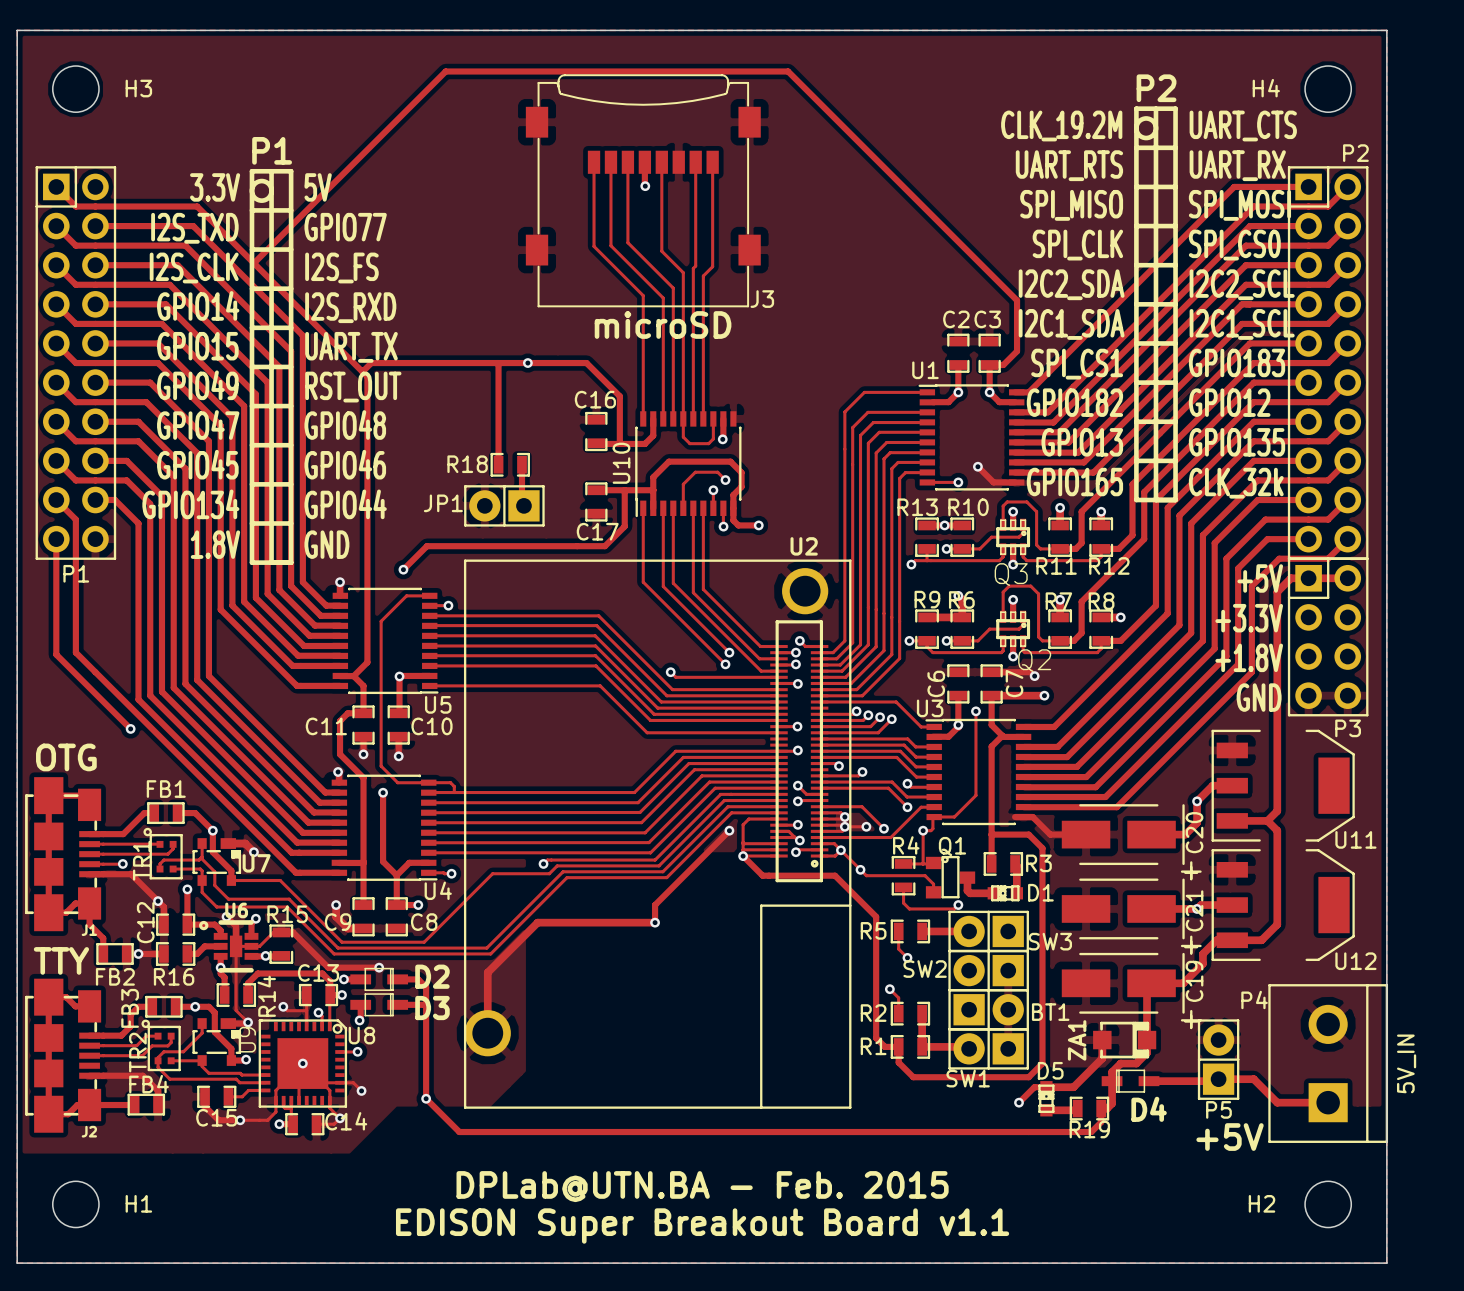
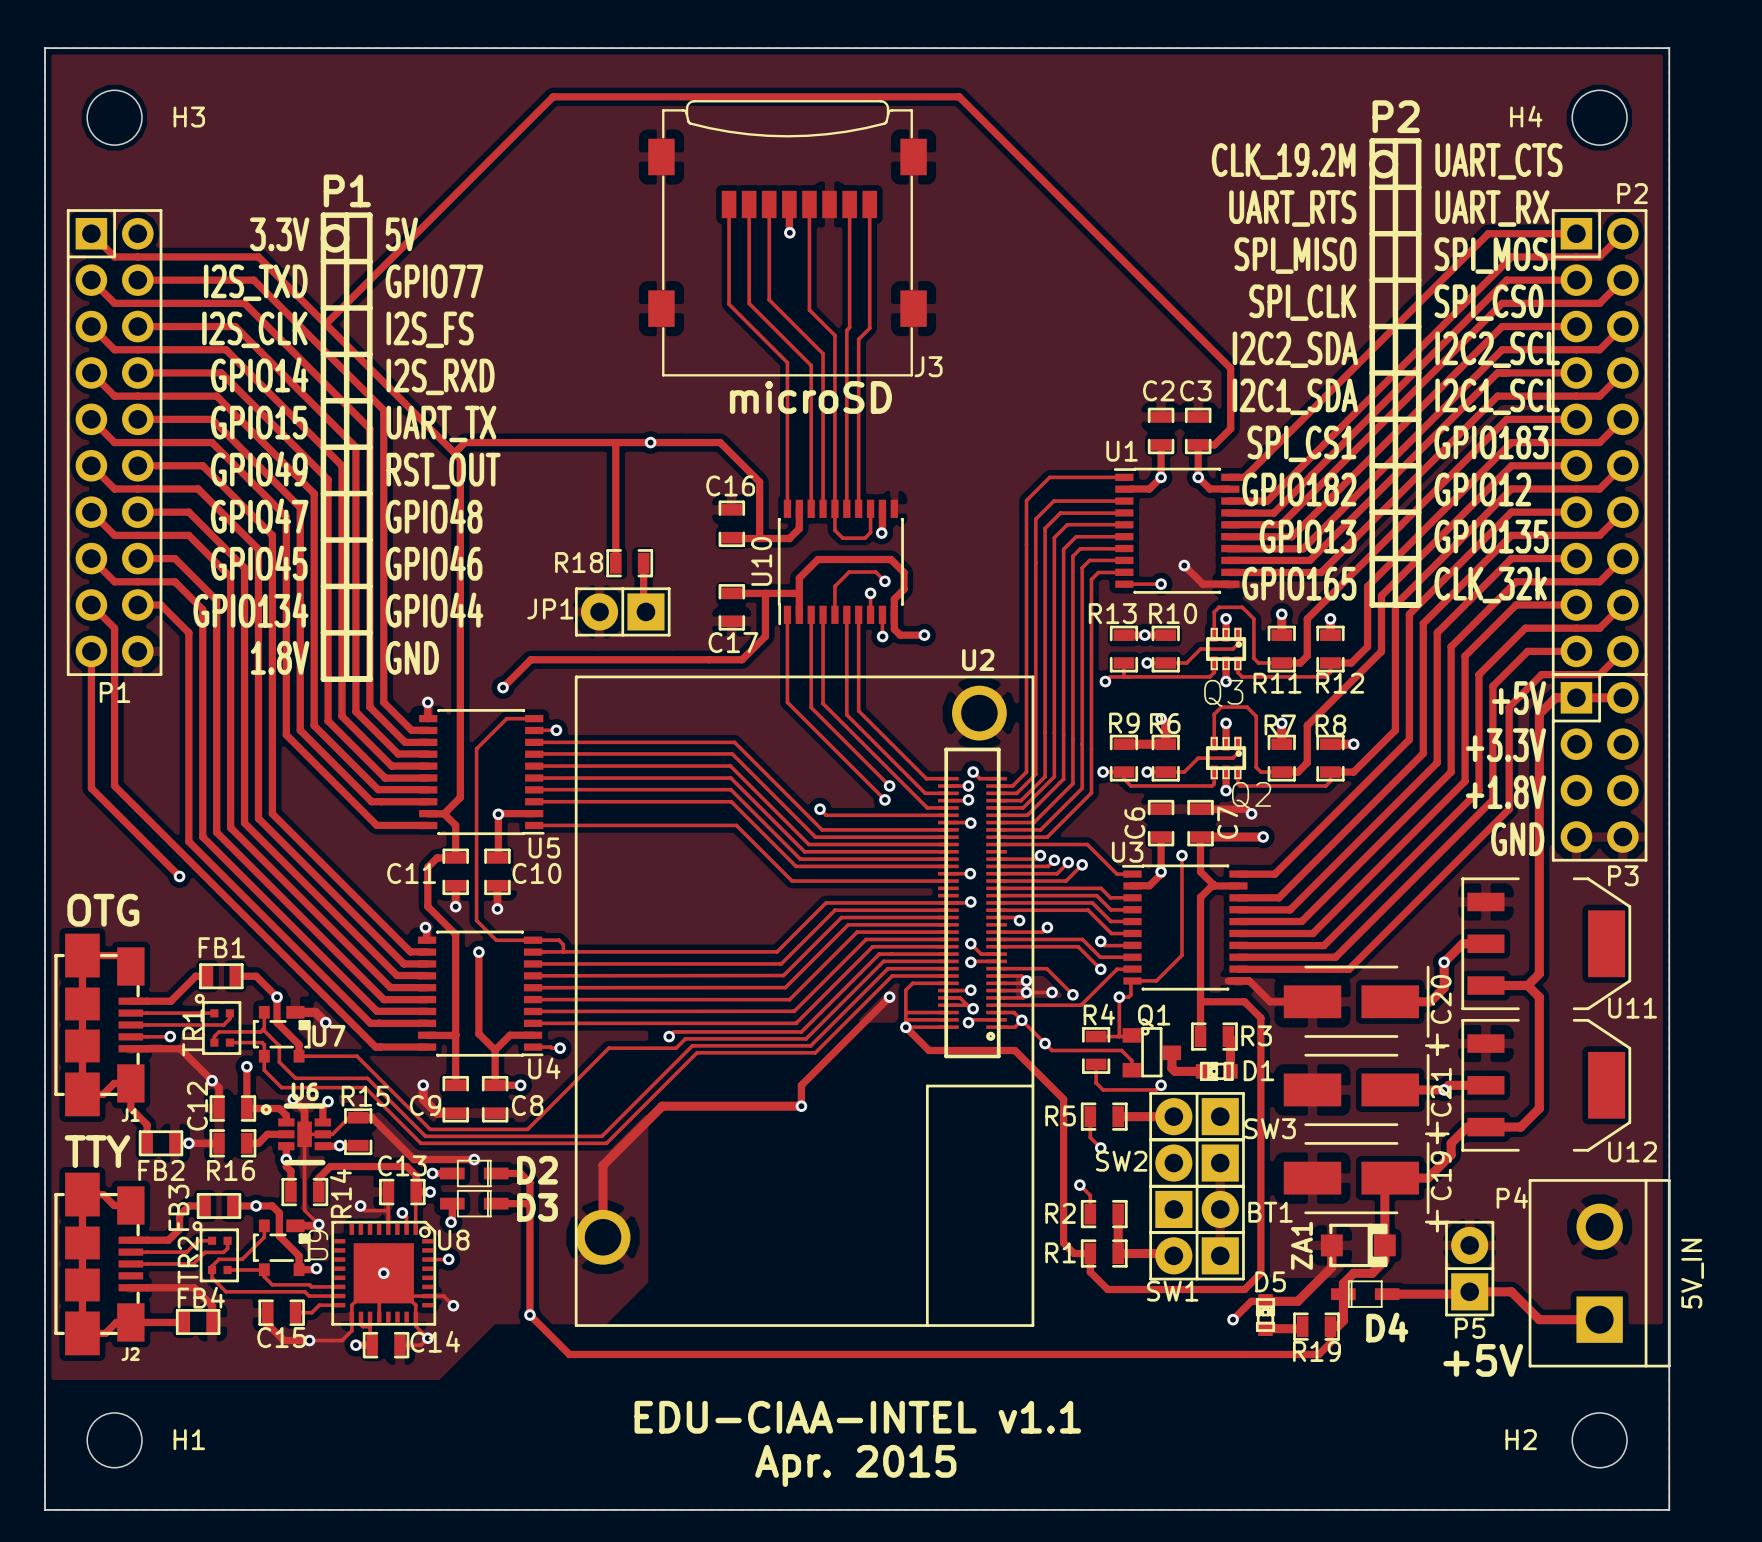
text: DPLab@UTN.BA - Feb. 2015 (702, 1186) -> EDU-CIAA-INTEL v1.1 (857, 1417)
text: EDISON Super Breakout Board v1.1 (702, 1226) -> Apr. 2015 (855, 1465)

